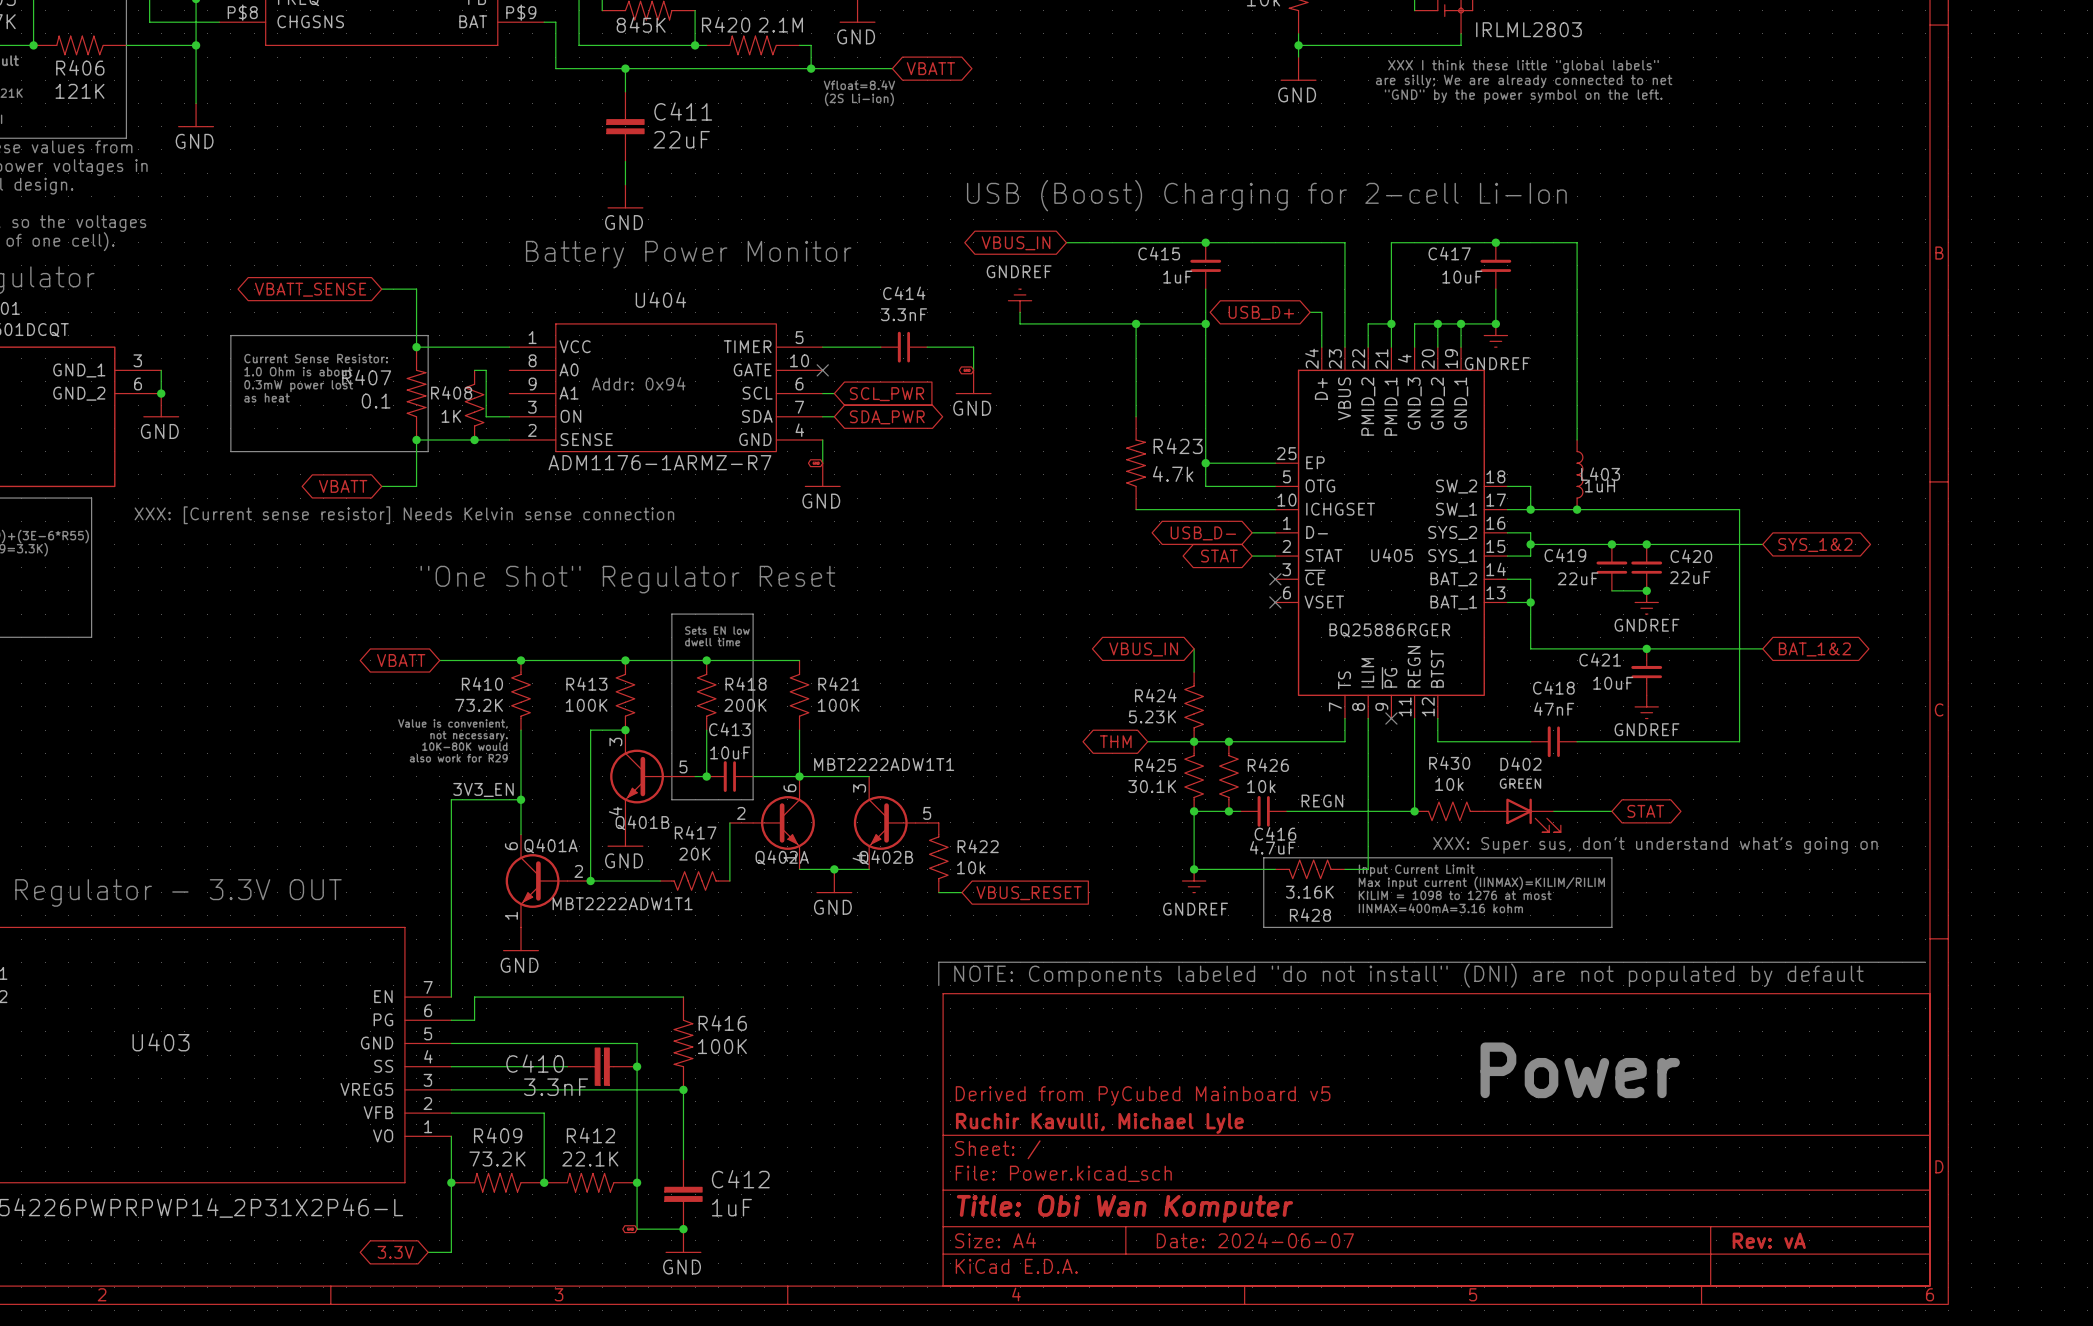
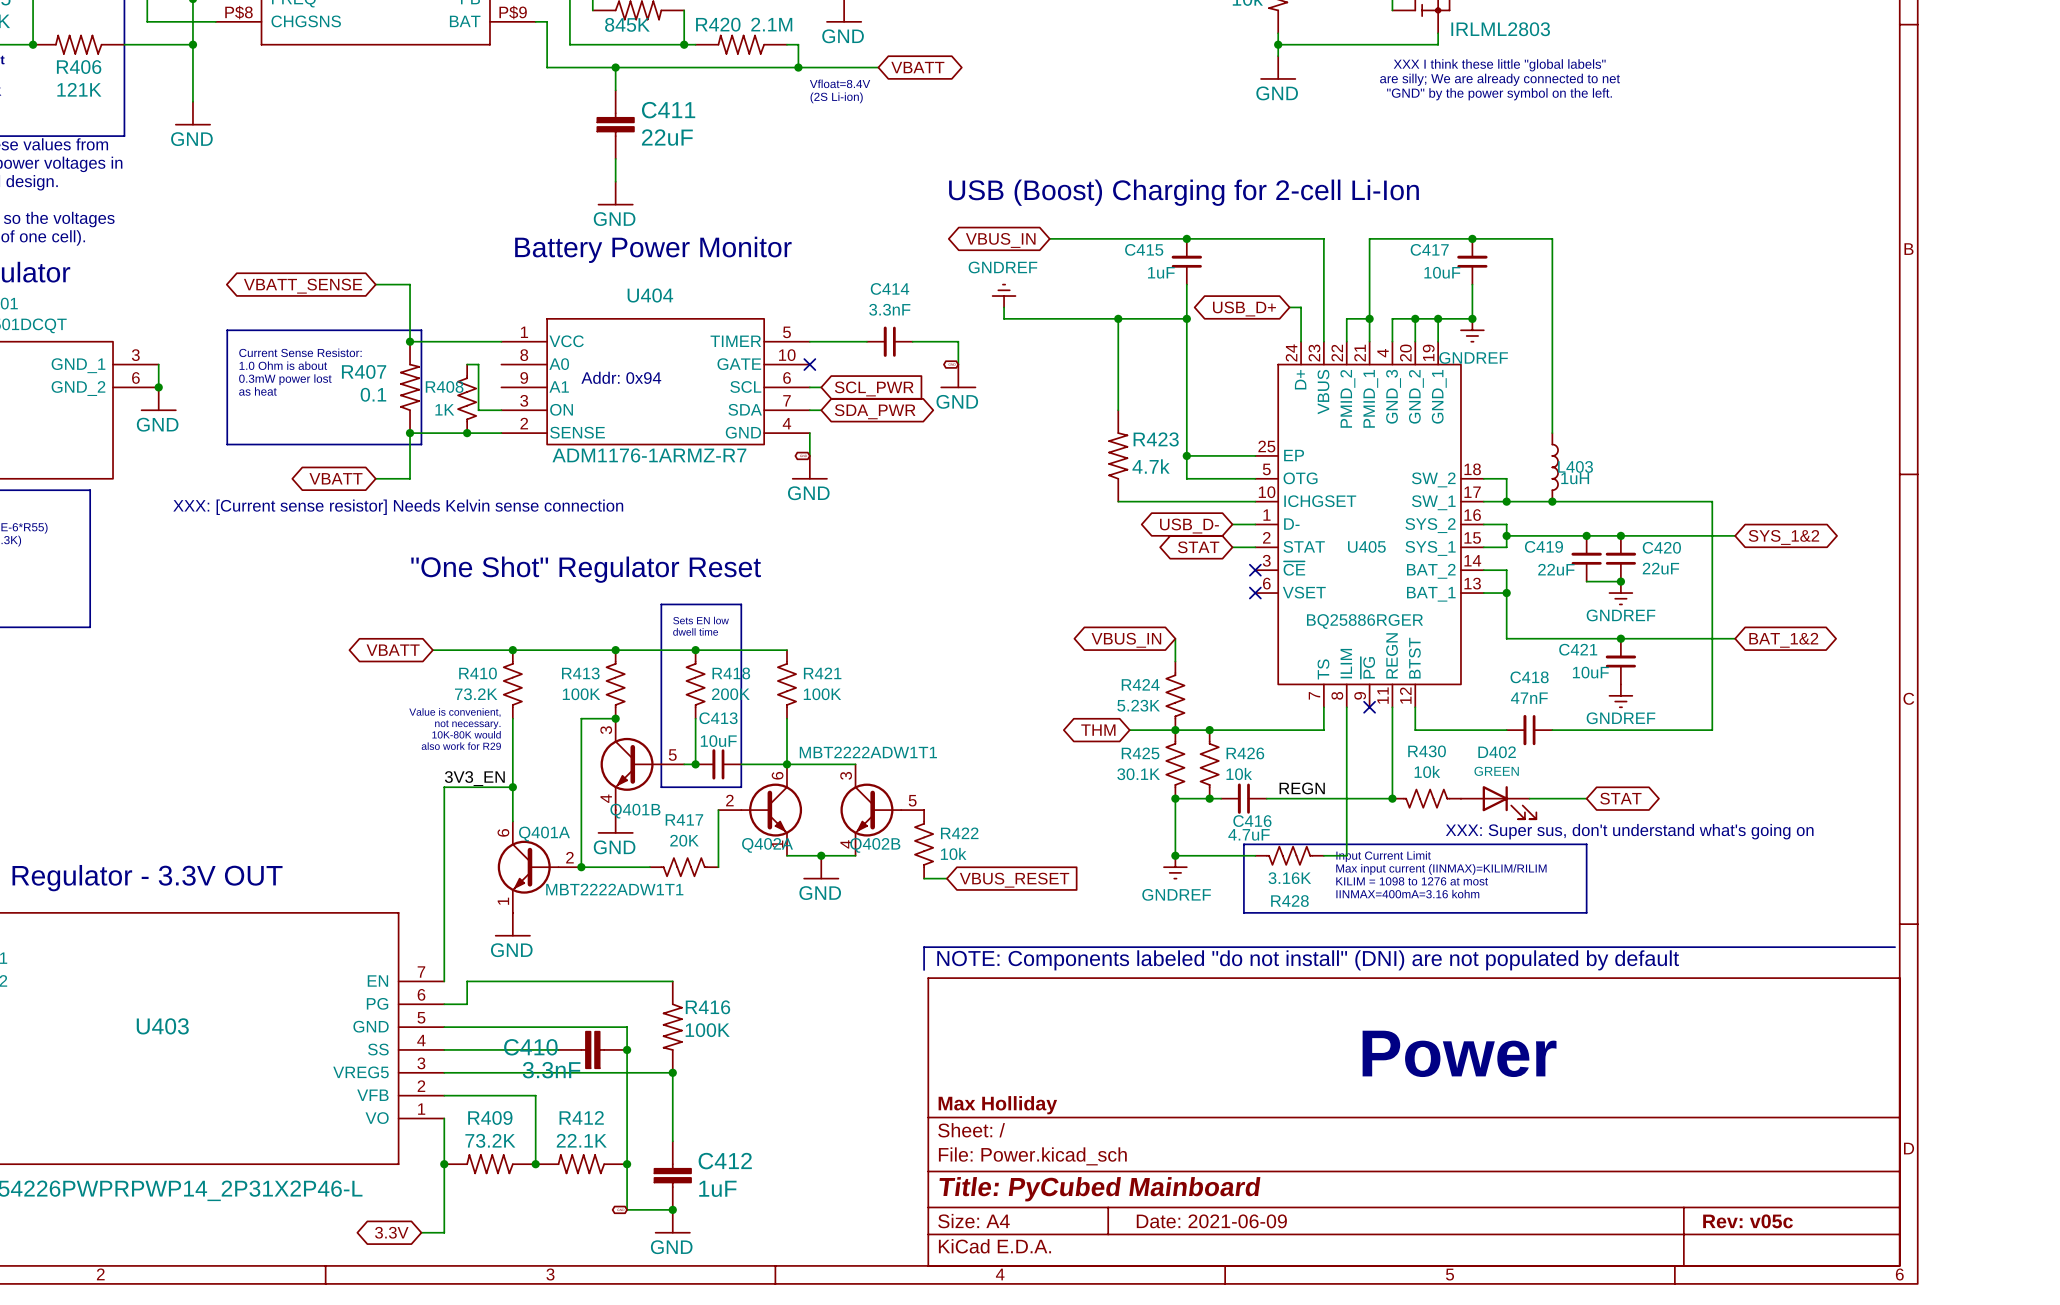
text position: Power (1580, 1070) -> Power (1459, 1053)
title block: Derived from PyCubed Mainboard v5 (1143, 1095) -> none
title block: Ruchir Kavulli, Michael Lyle (1099, 1123) -> Max Holliday (997, 1105)
title block: Title: Obi Wan Komputer (1124, 1208) -> Title: PyCubed Mainboard (1099, 1189)
title block: Date: 2024-06-07 (1255, 1240) -> Date: 2021-06-09 (1211, 1221)
title block: Rev: vA (1769, 1240) -> Rev: v05c (1748, 1221)

